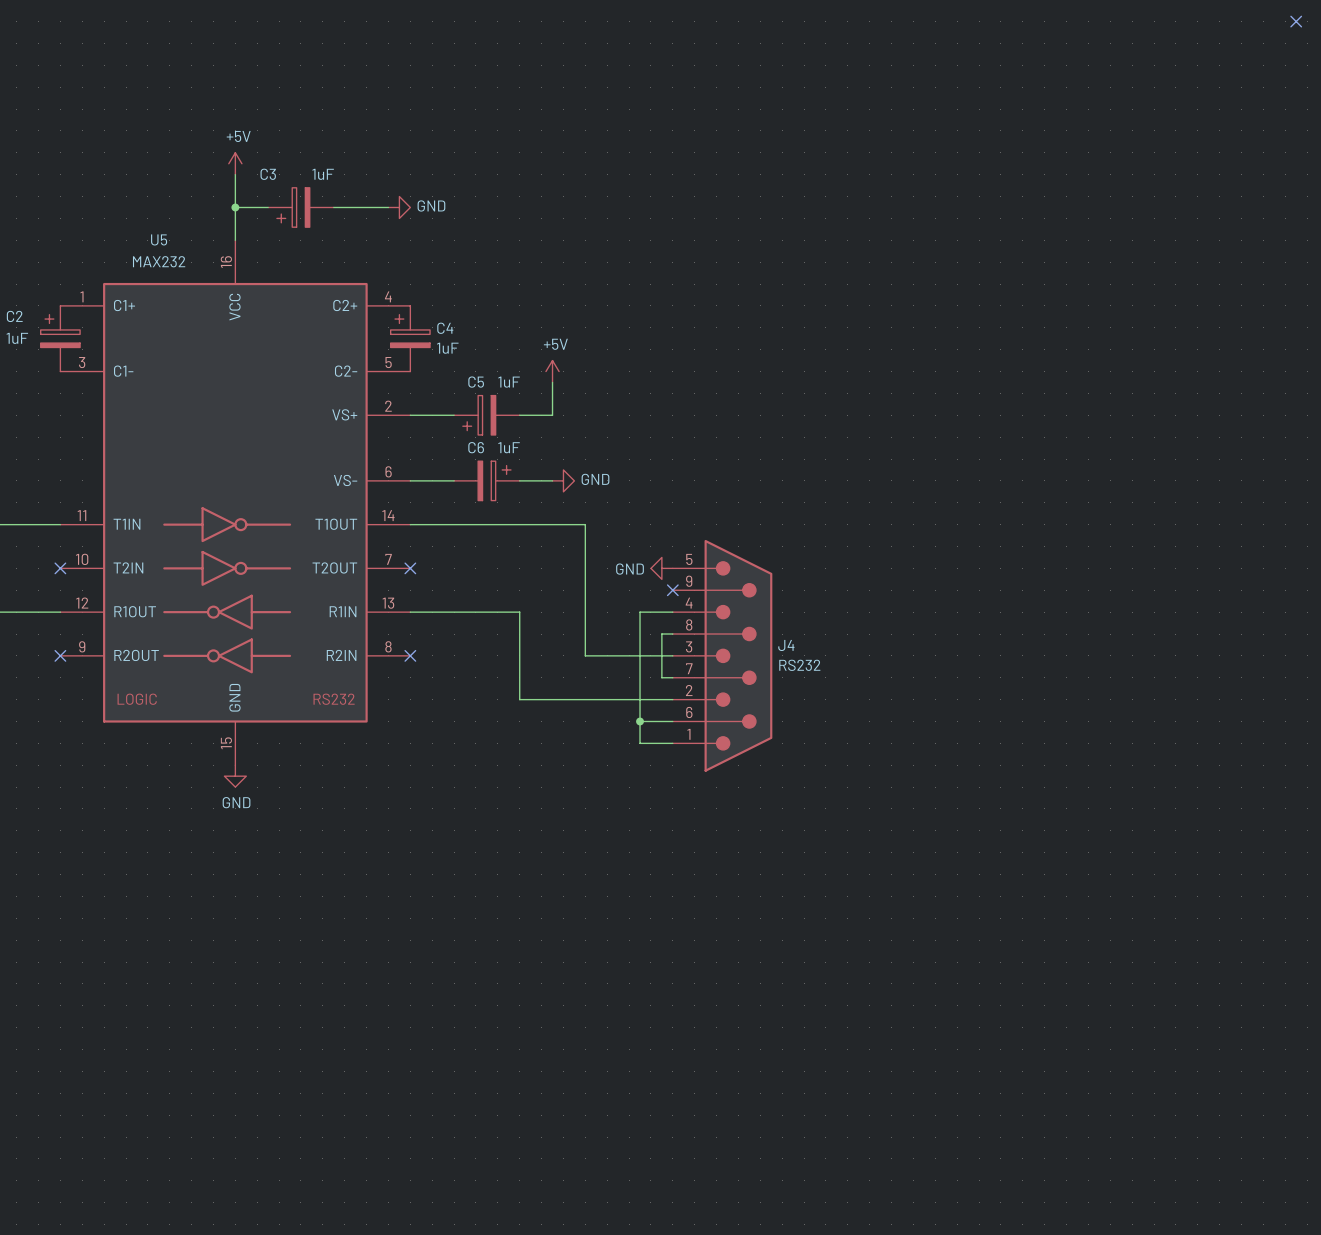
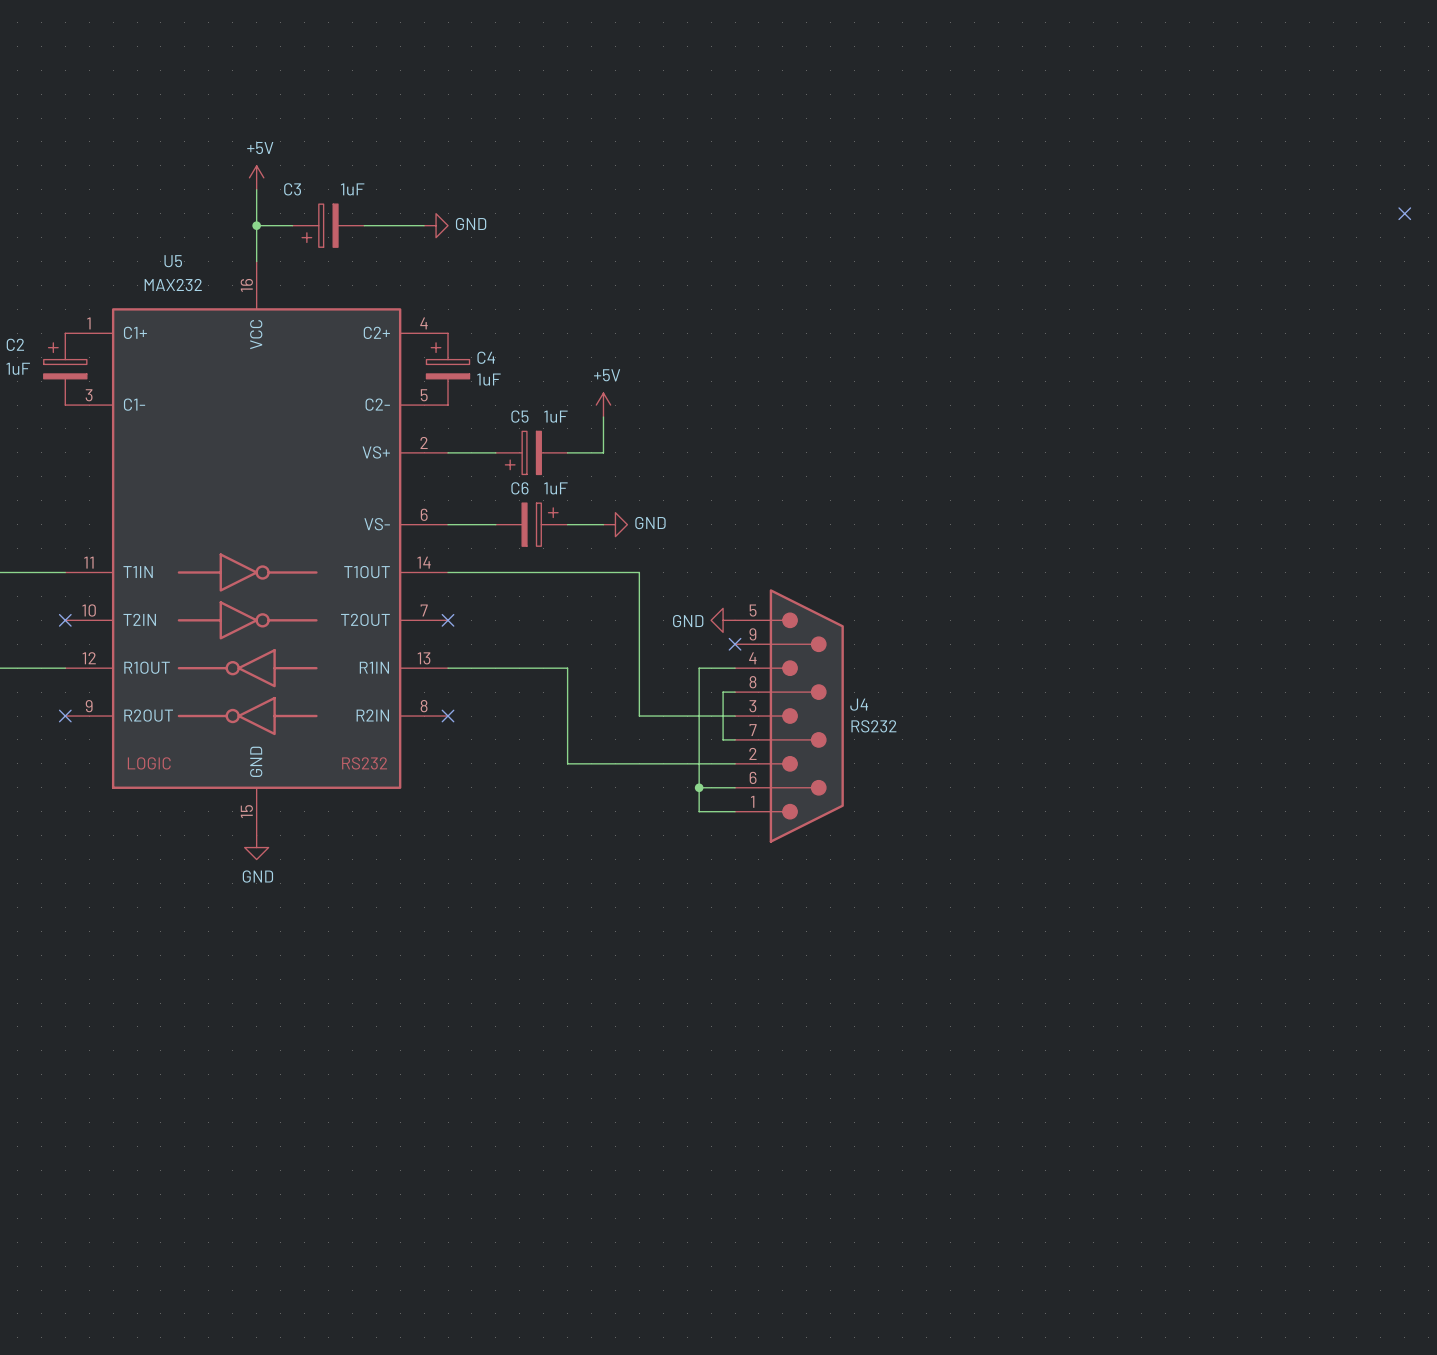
no-connect mark: (1296, 21) -> none
no-connect mark: none -> (1404, 213)

